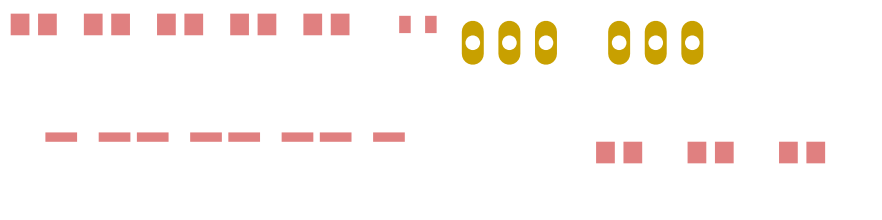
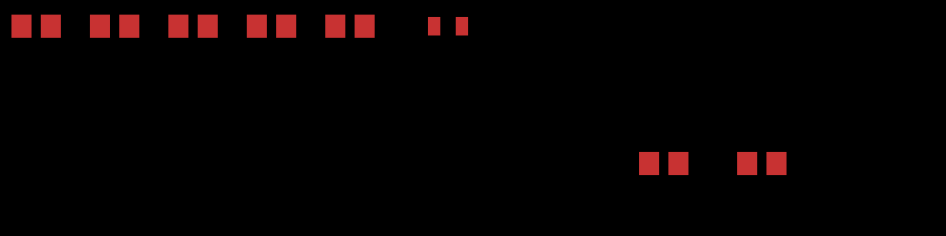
part: (509, 42) -> none
part: (655, 42) -> none
part: (87, 137) -> none
part: (179, 137) -> none
part: (270, 137) -> none
part: (362, 137) -> none
part: (802, 152) -> none

